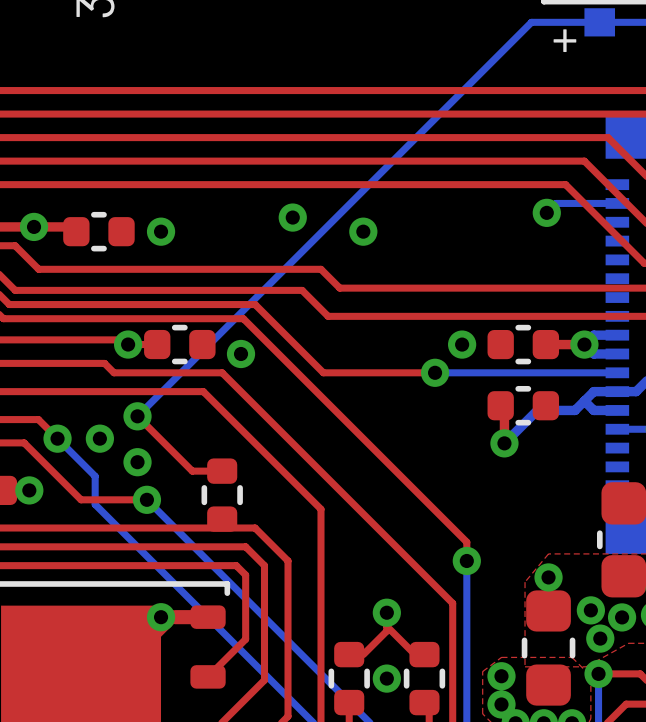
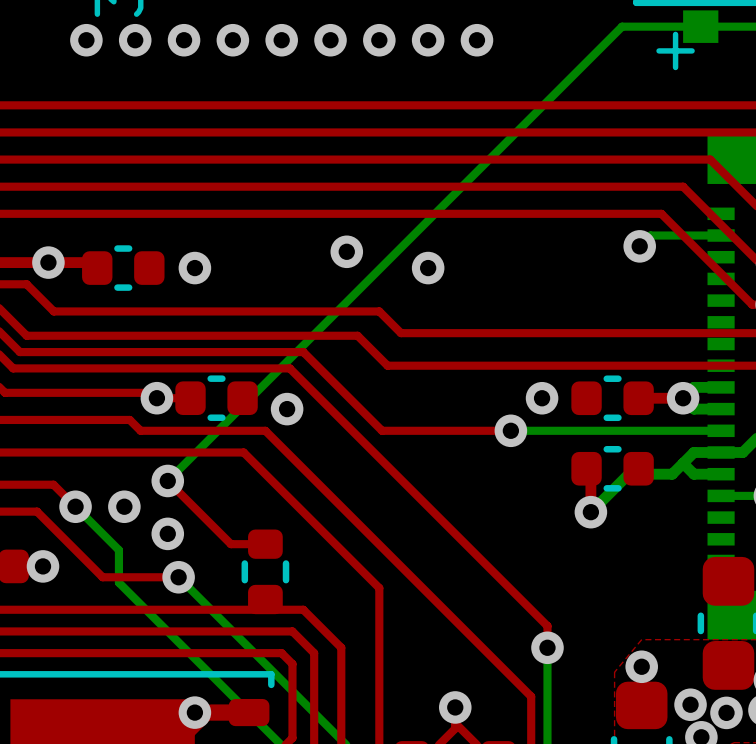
via: none -> (86, 40)
via: none -> (135, 40)
via: none -> (184, 40)
via: none -> (232, 40)
via: none -> (281, 40)
via: none -> (330, 40)
via: none -> (379, 40)
via: none -> (428, 40)
via: none -> (476, 40)

